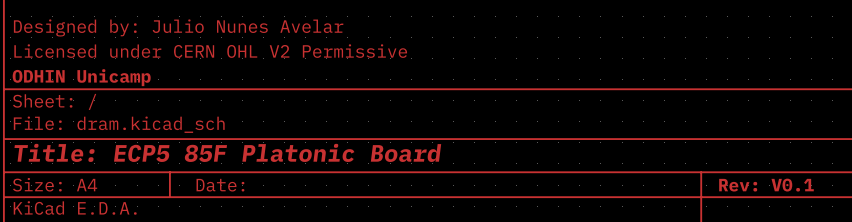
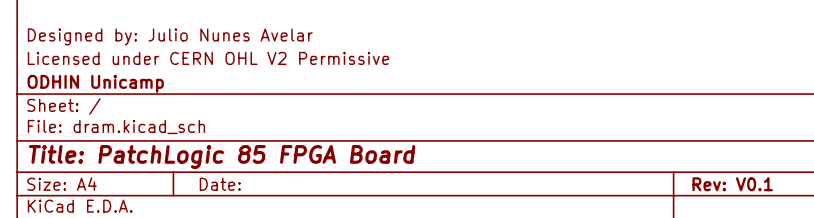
title block: Title: ECP5 85F Platonic Board (227, 152) -> Title: PatchLogic 85 FPGA Board (222, 157)

